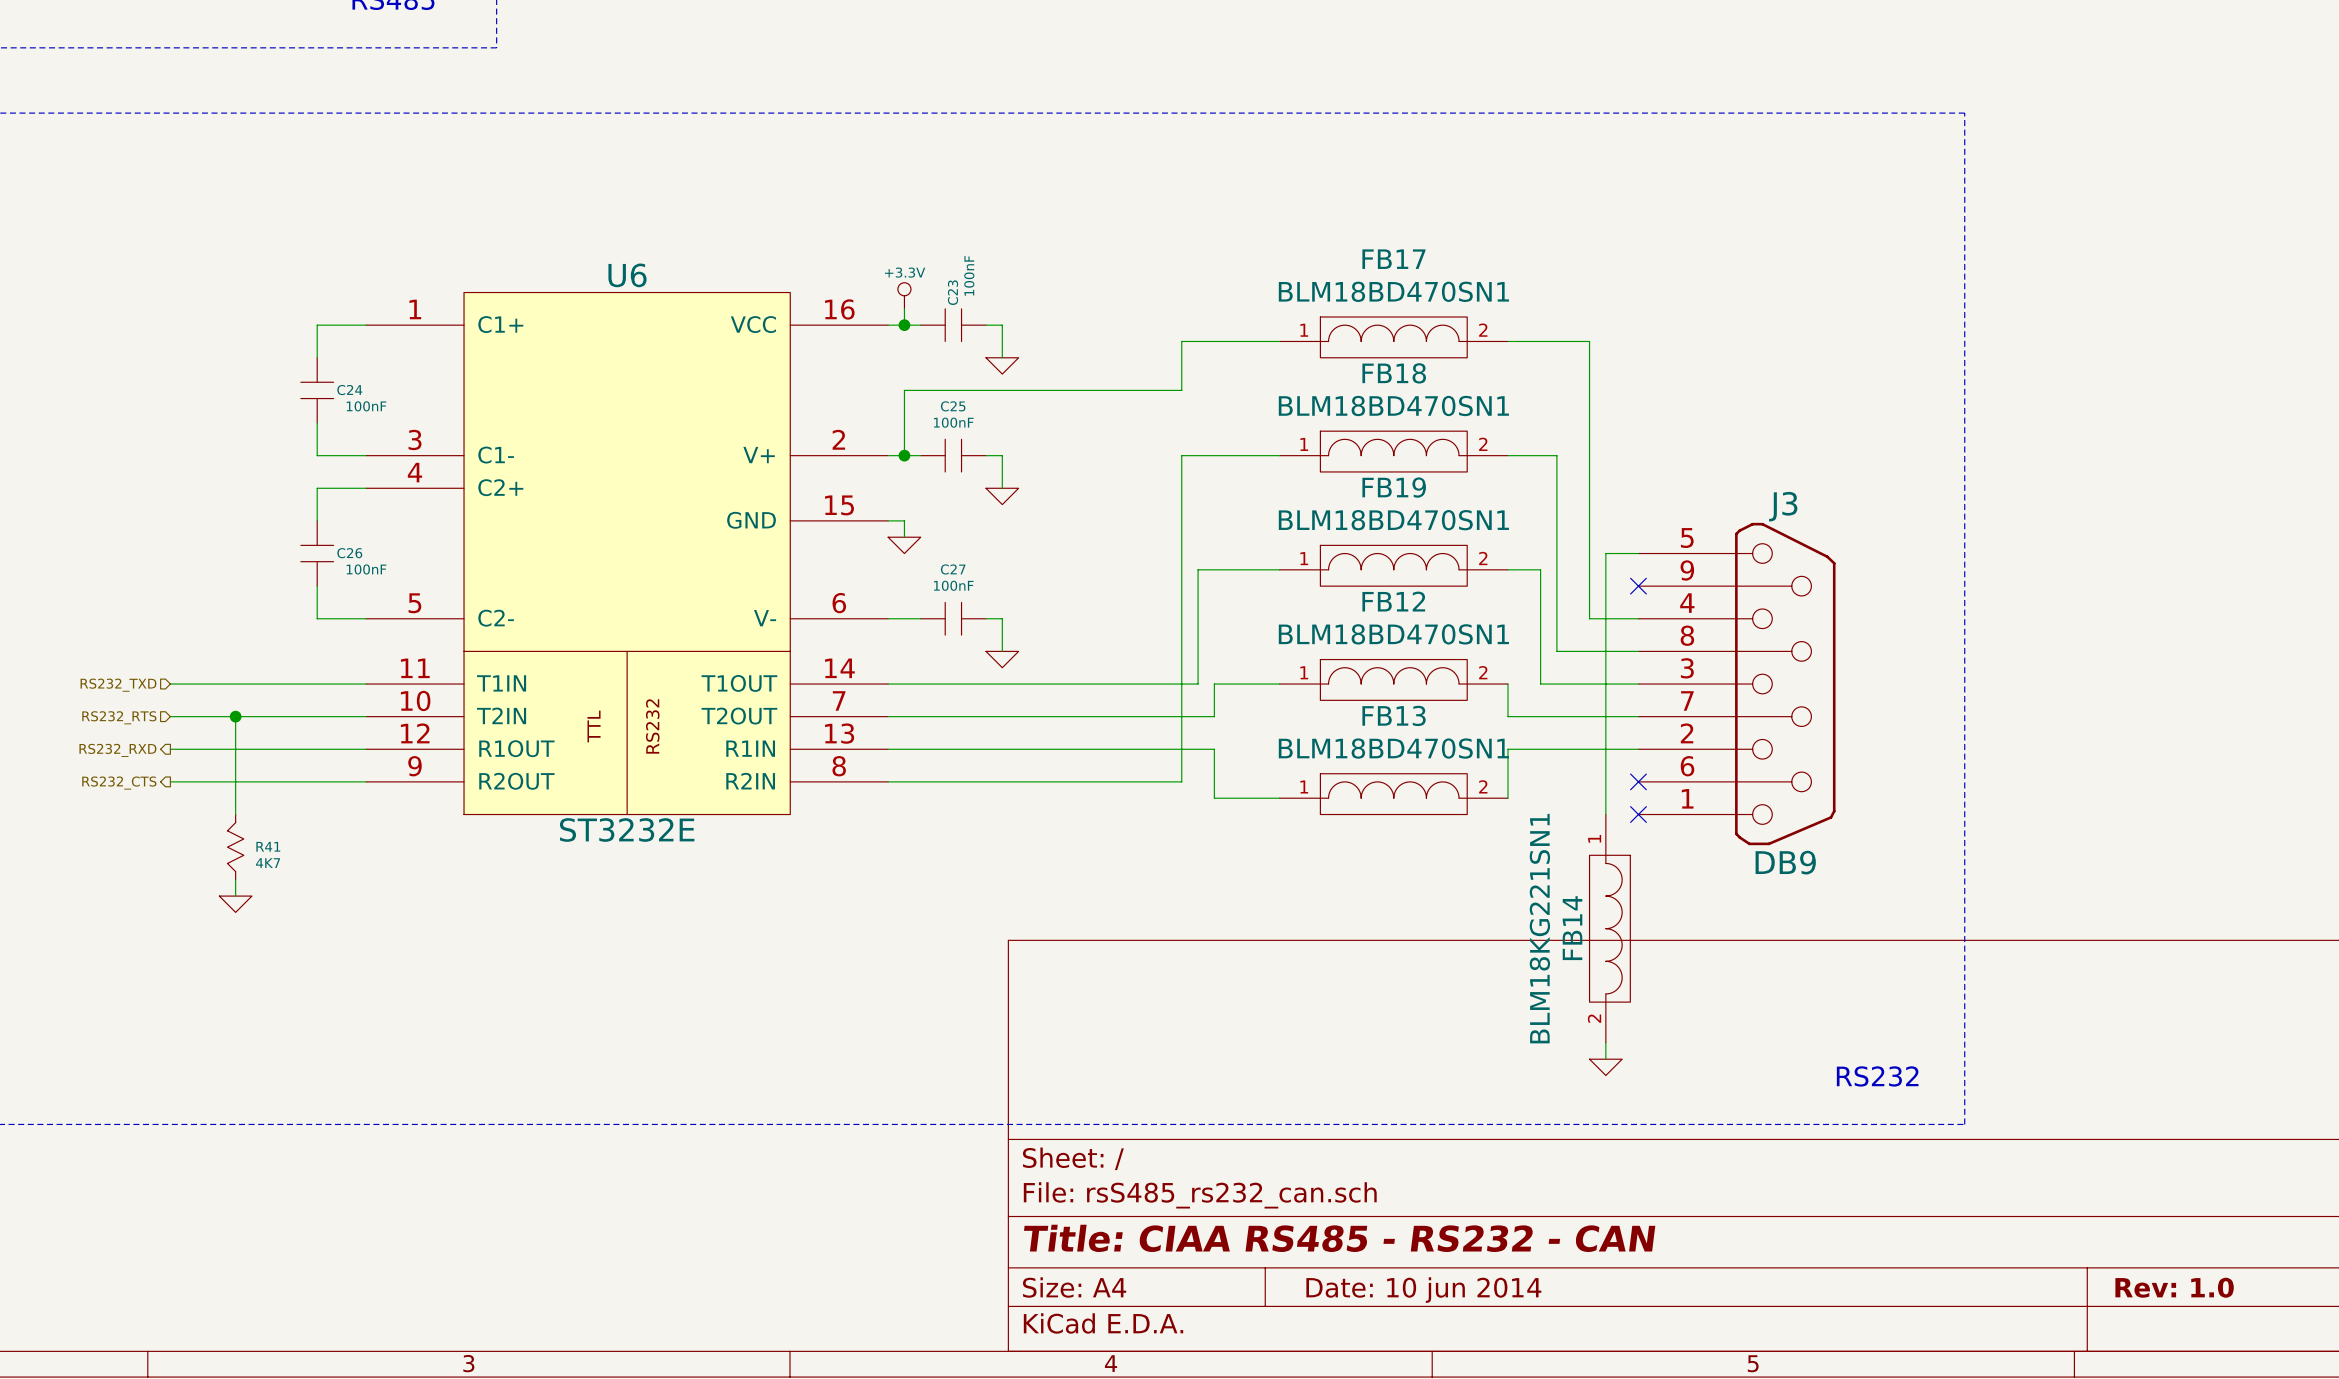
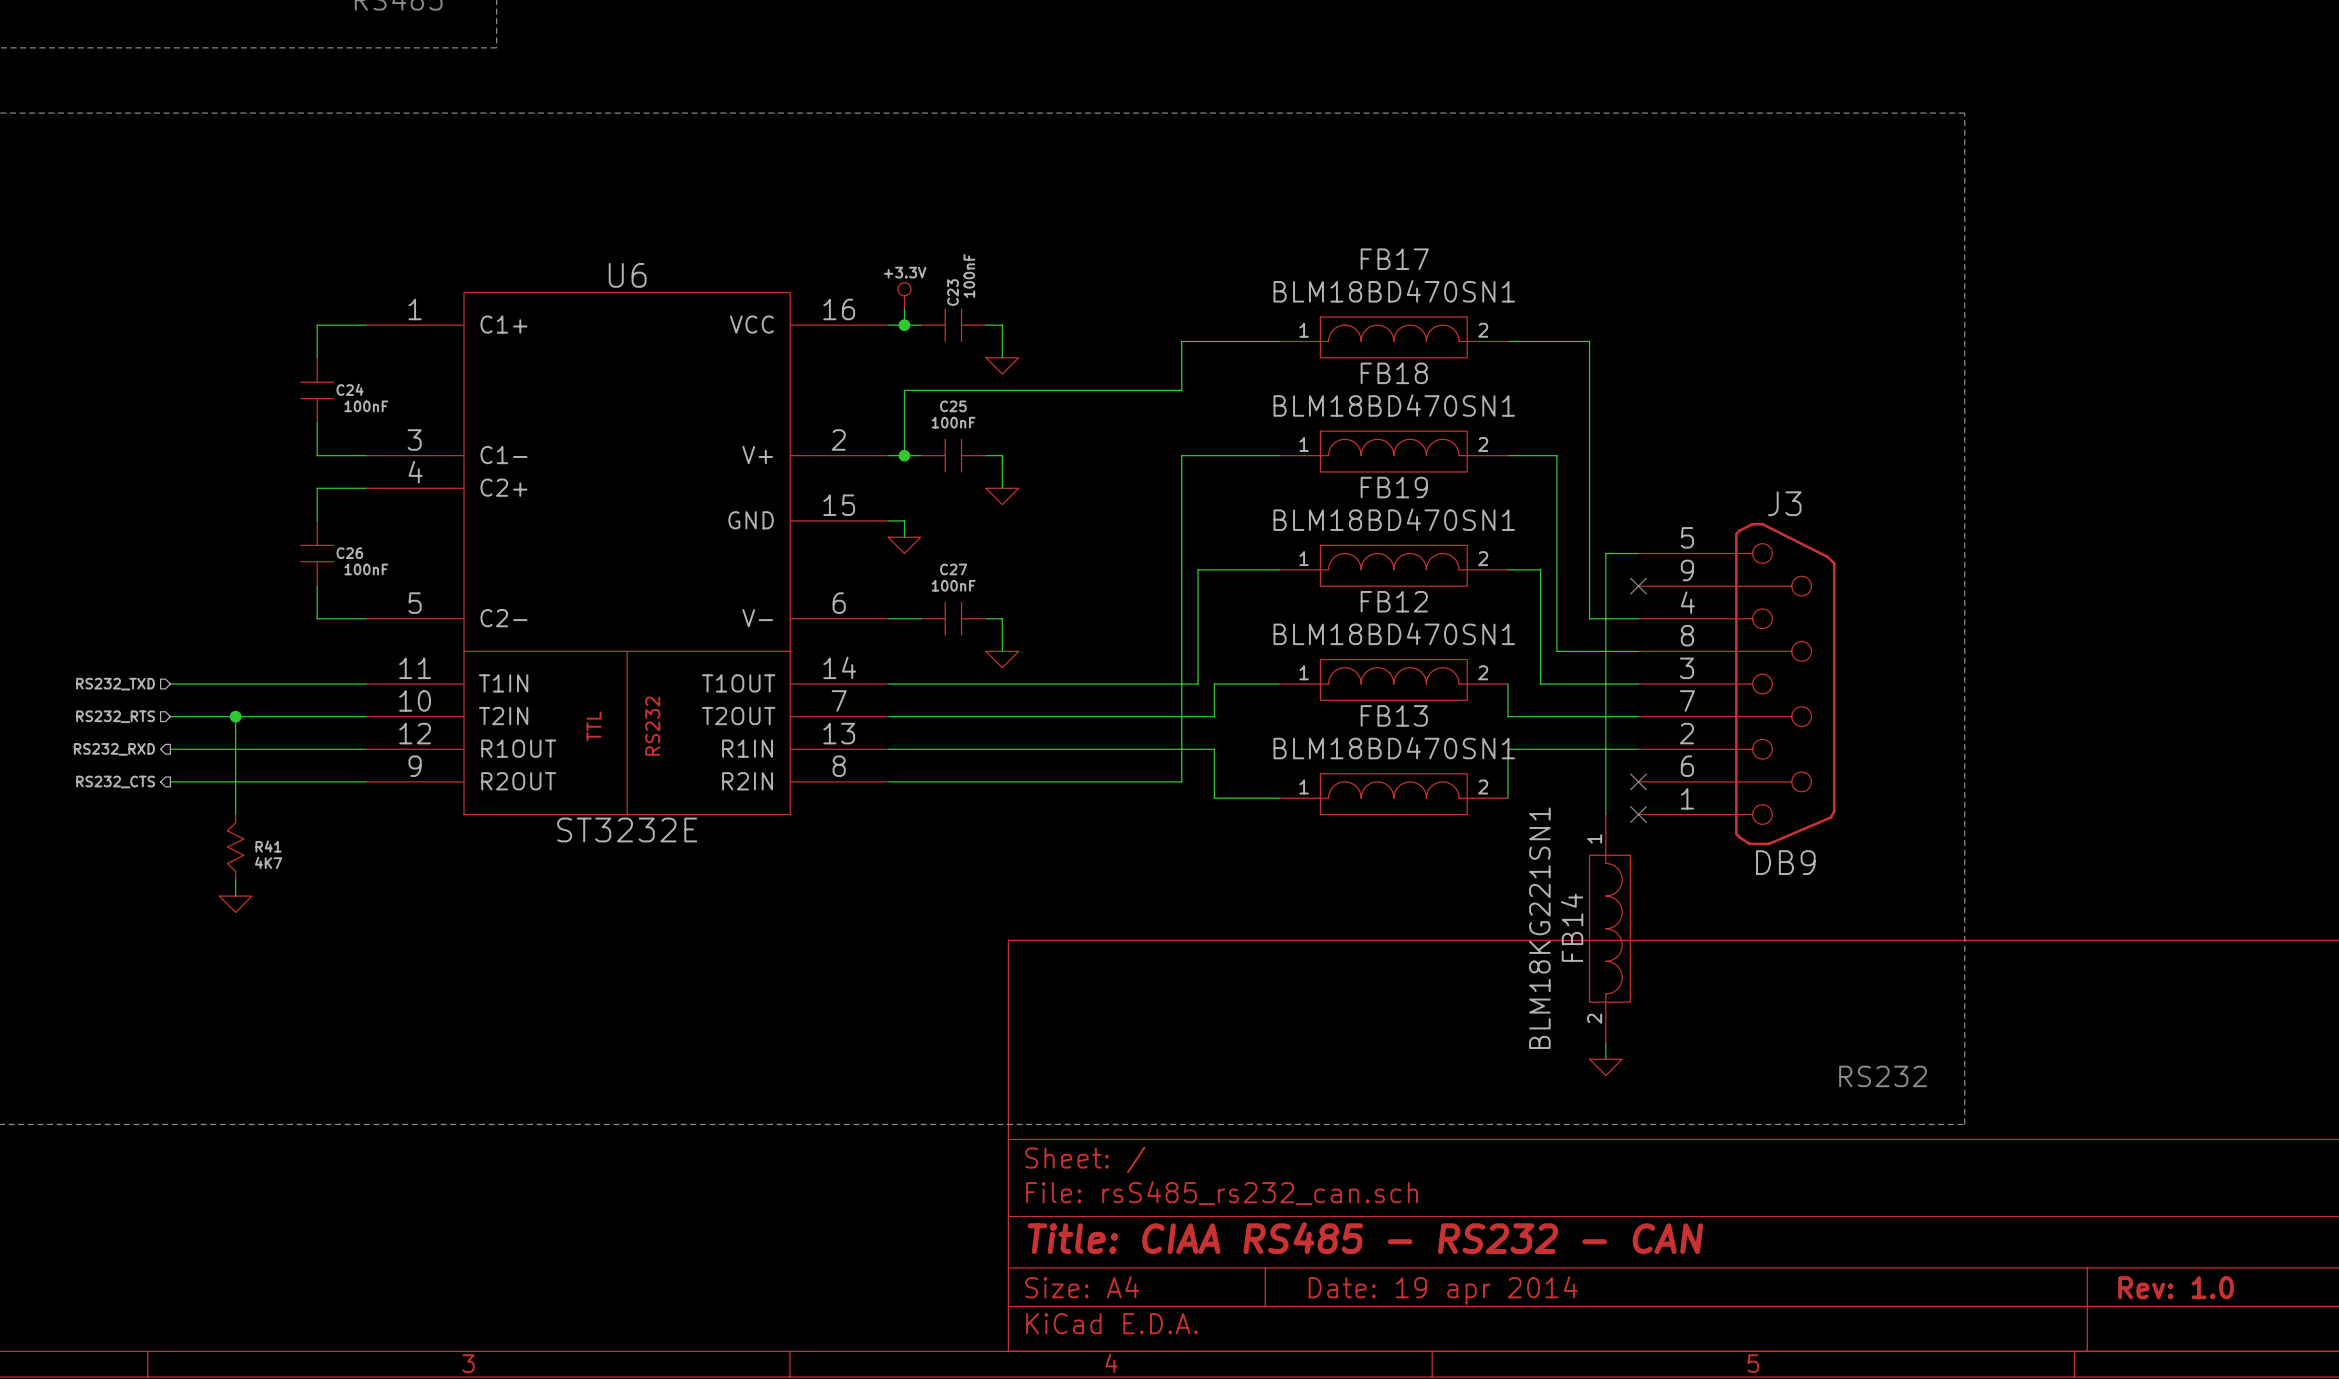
title block: Date: 10 jun 2014 (1423, 1290) -> Date: 19 apr 2014 (1443, 1290)

